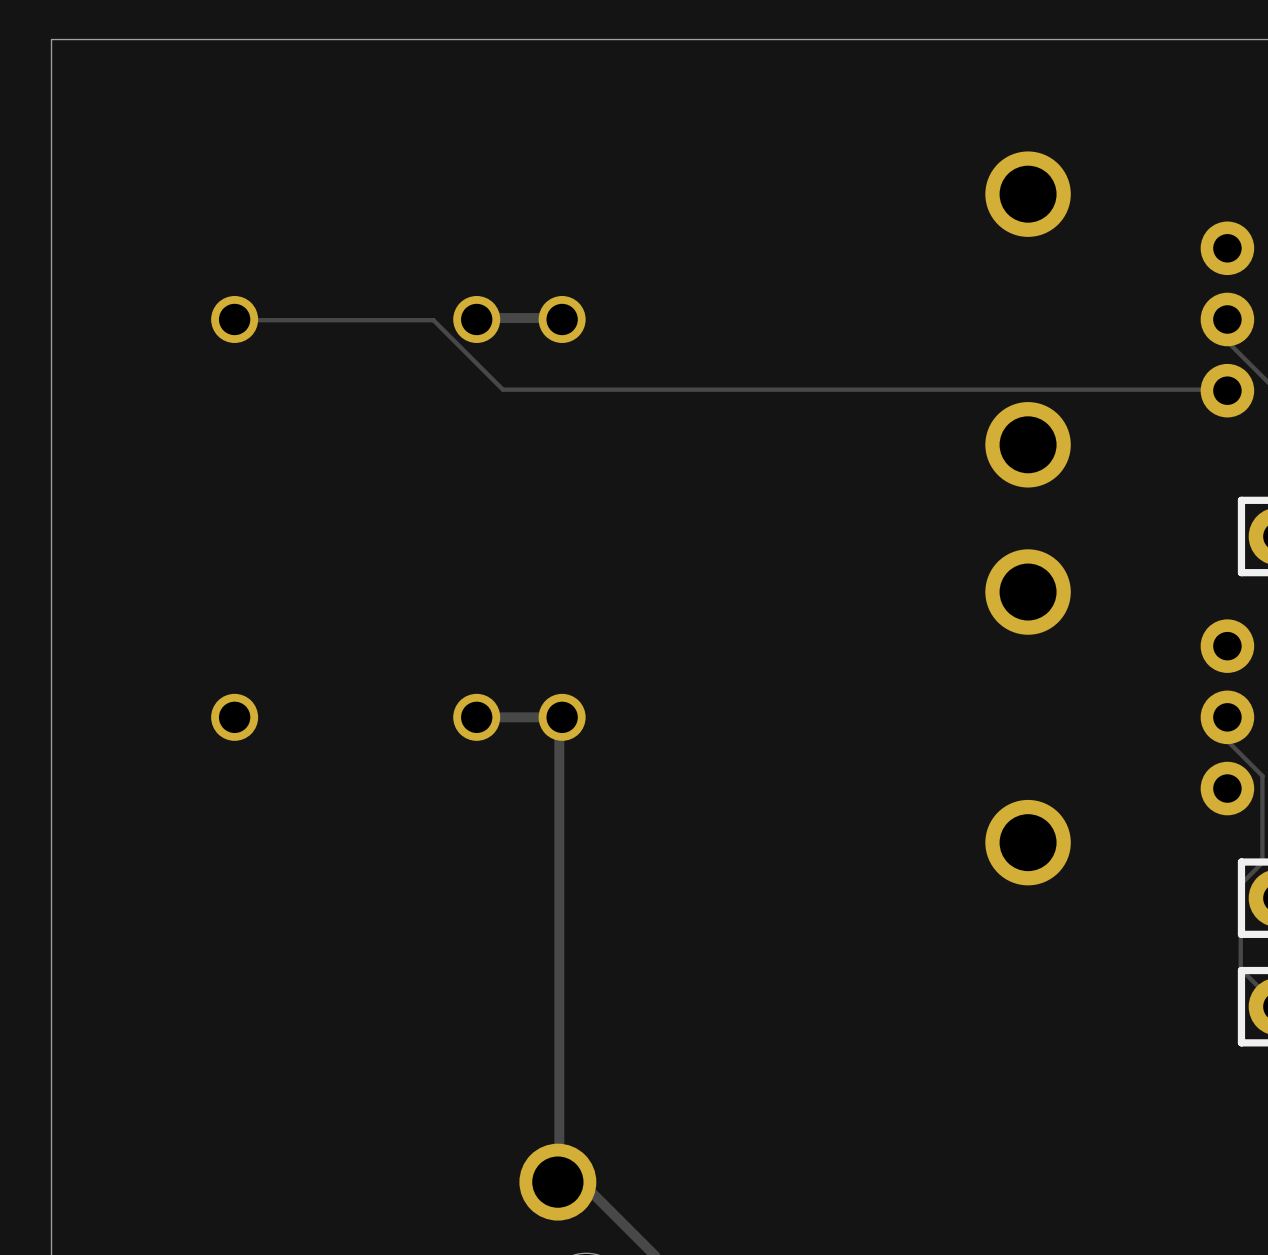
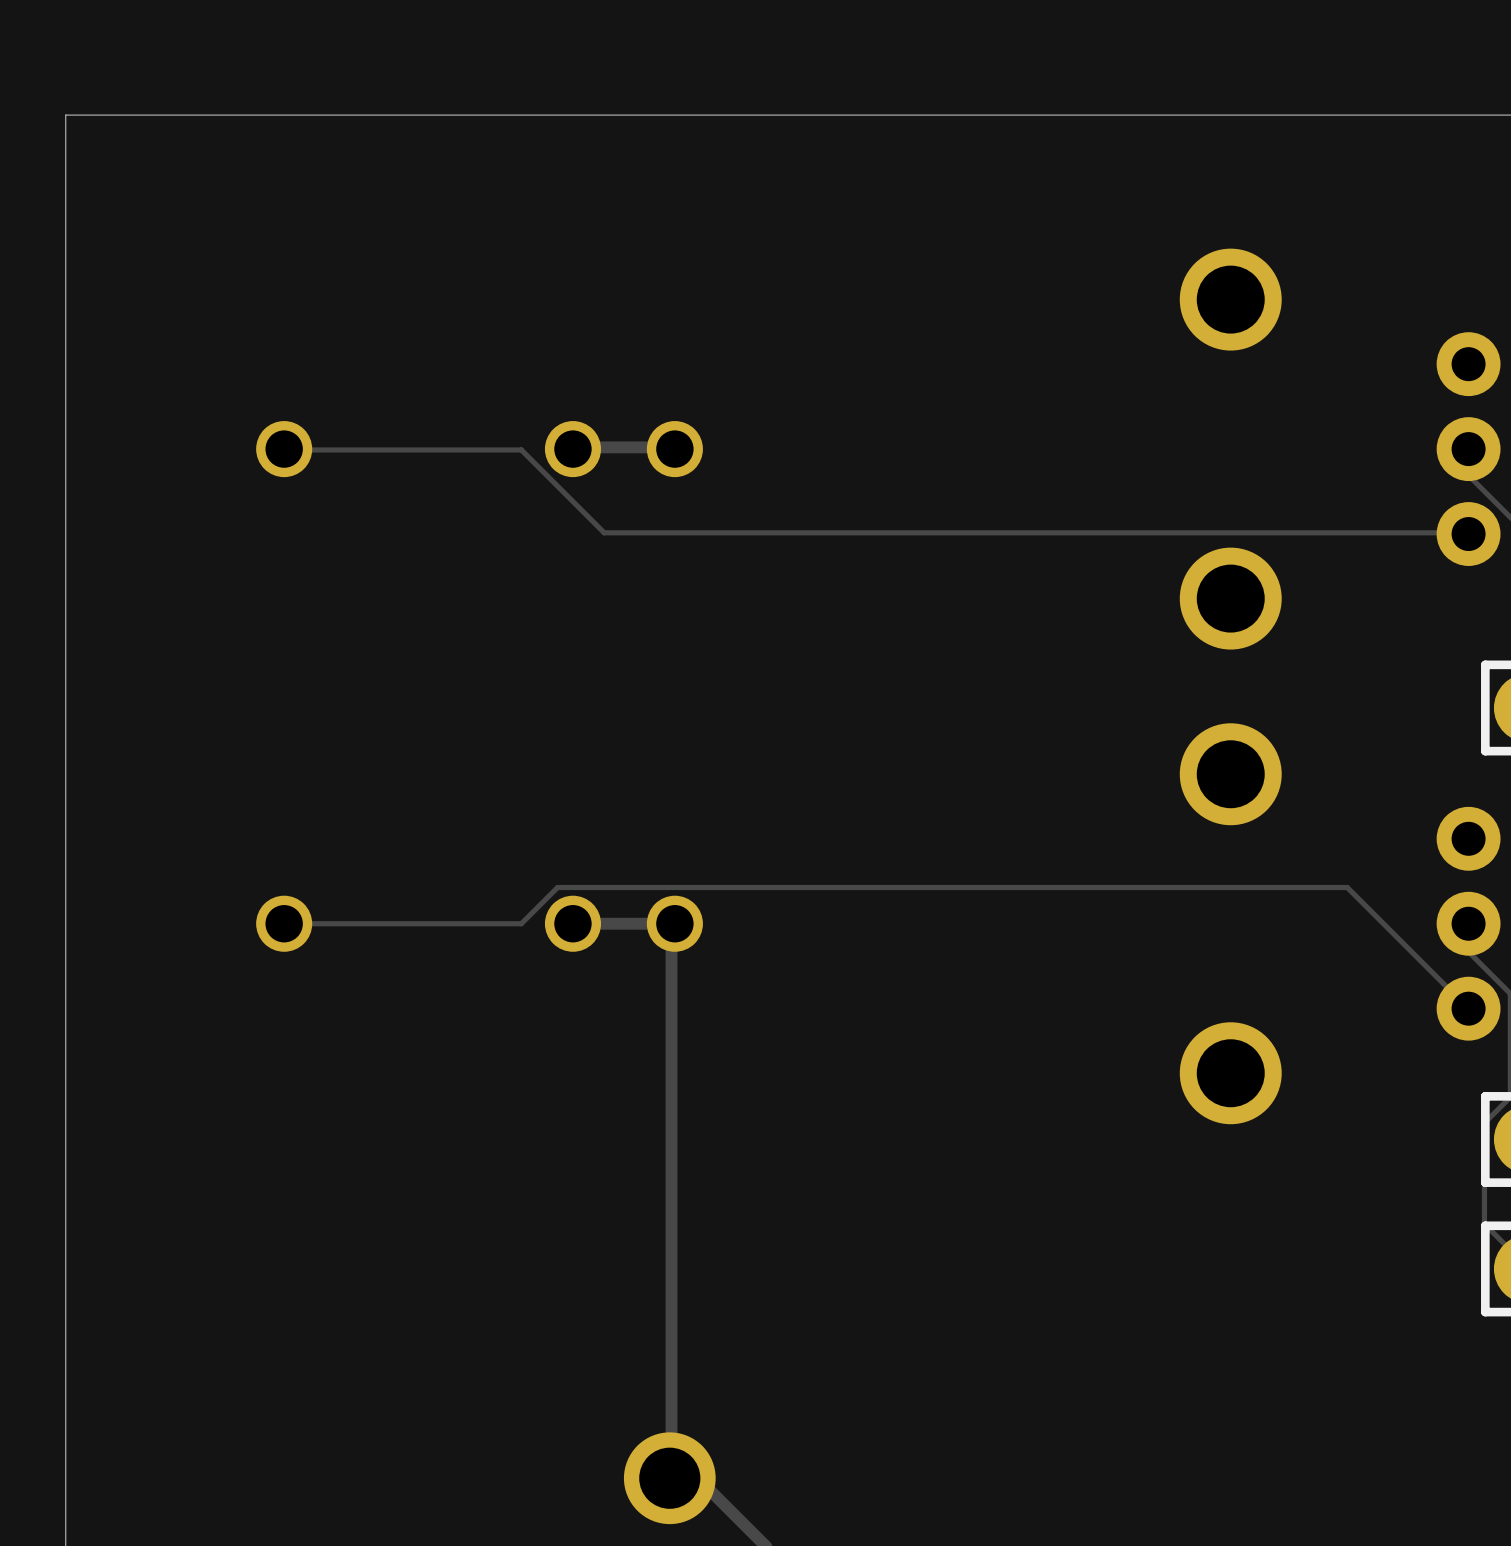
track: none -> (284, 923) (521, 923) (557, 887) (1347, 887) (1468, 1008)

